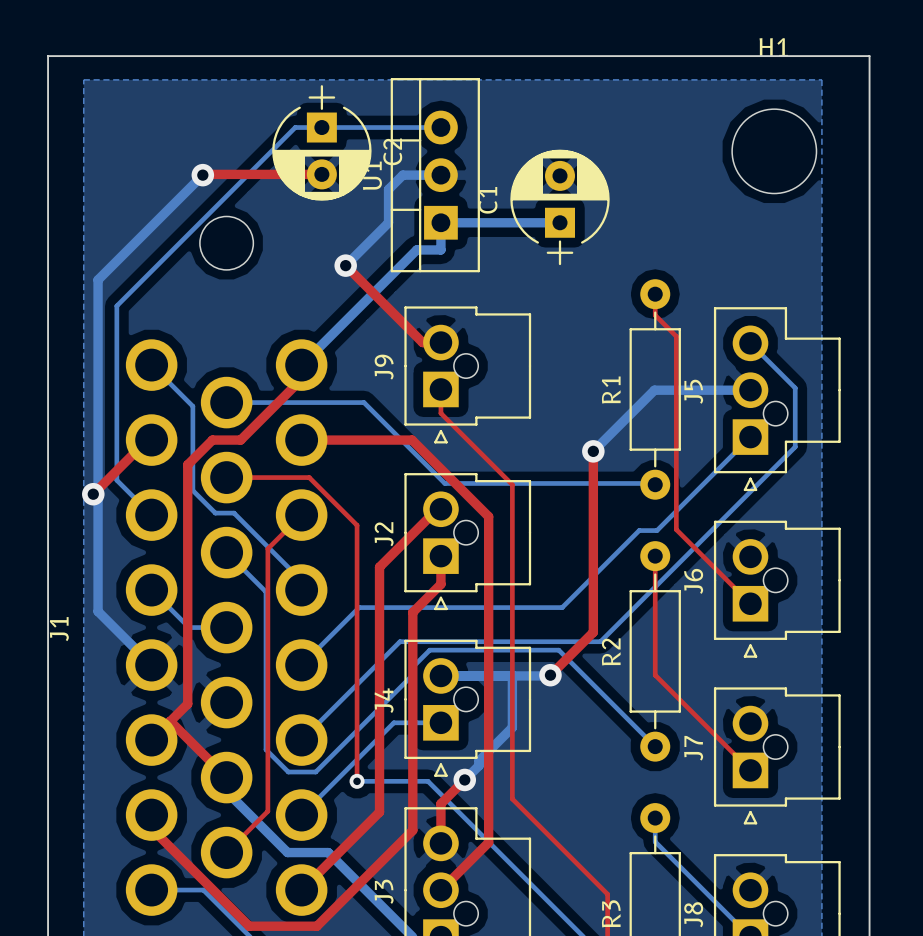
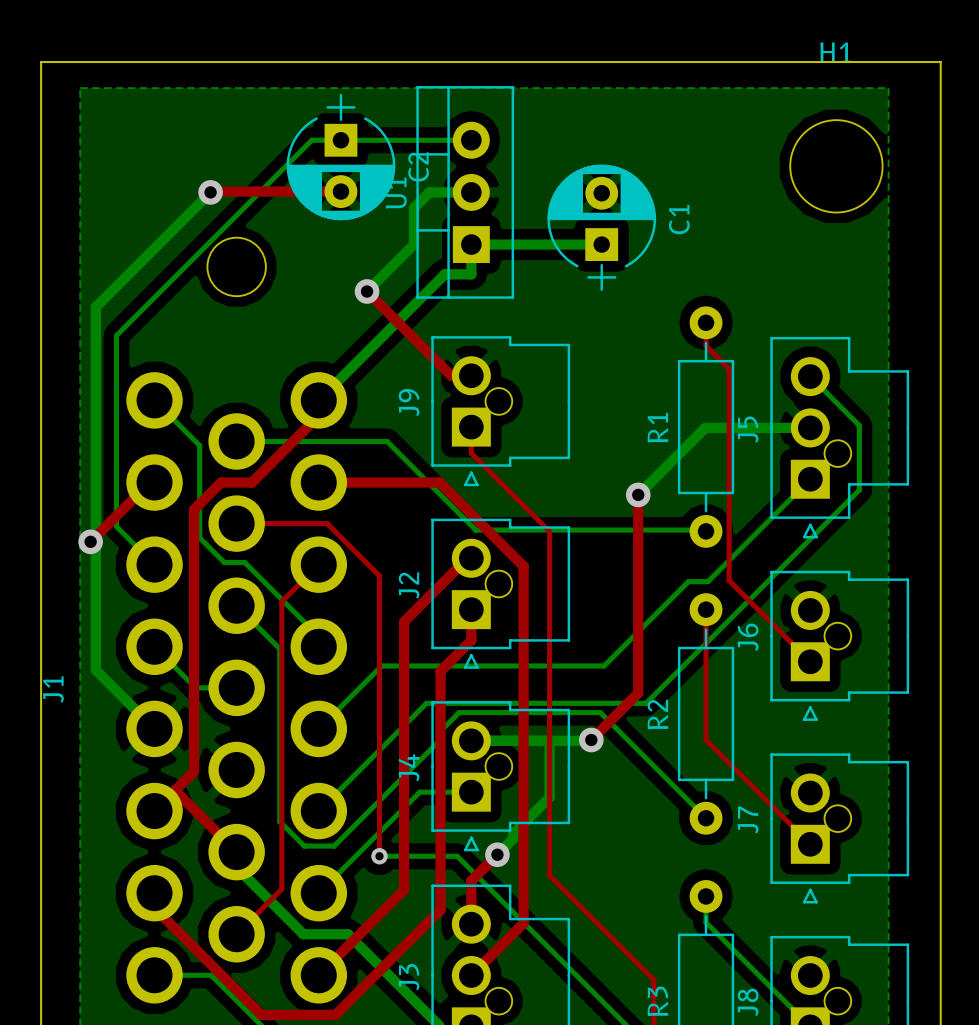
C1 name position: C1 (487, 200) -> C1 (679, 219)

